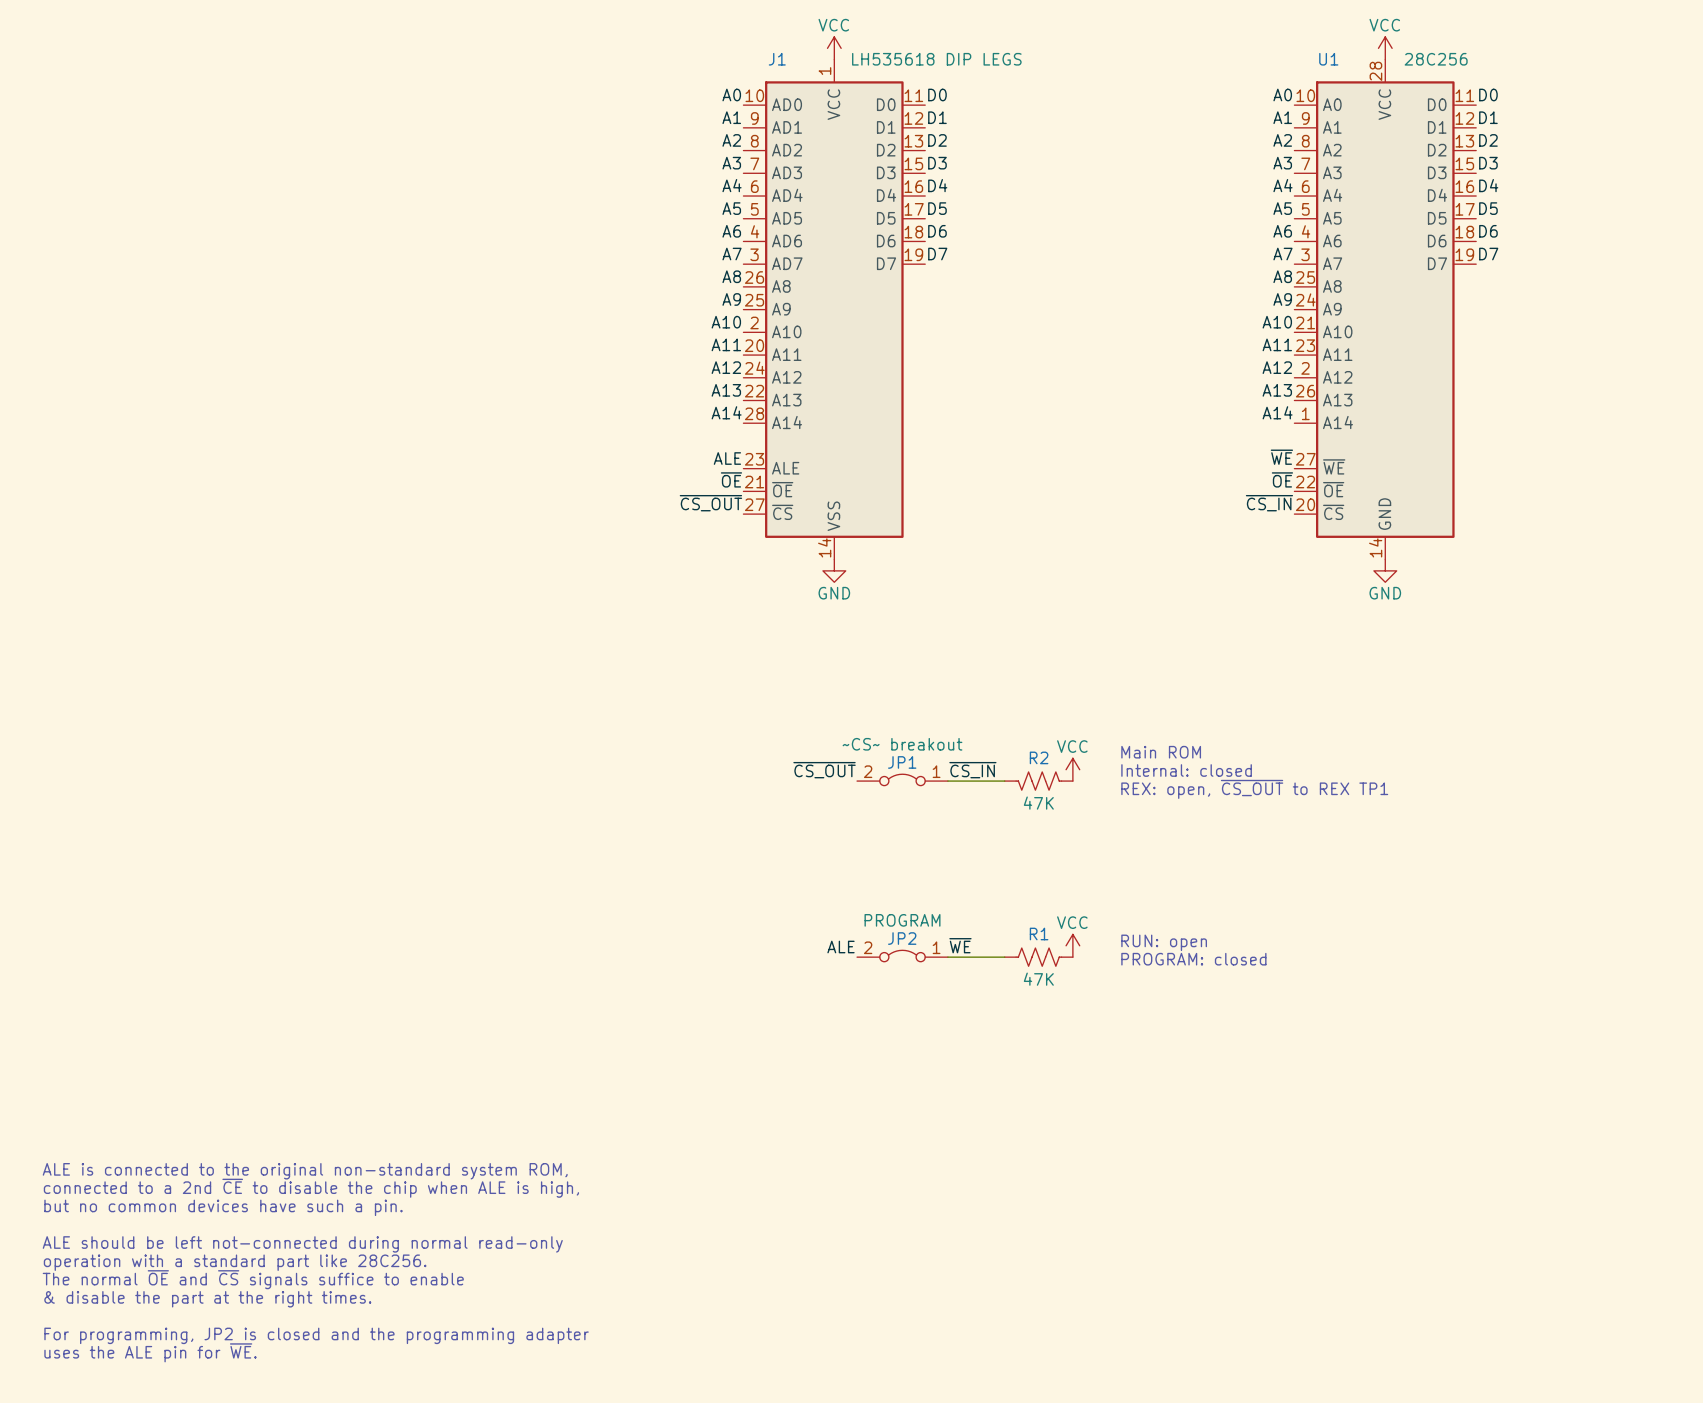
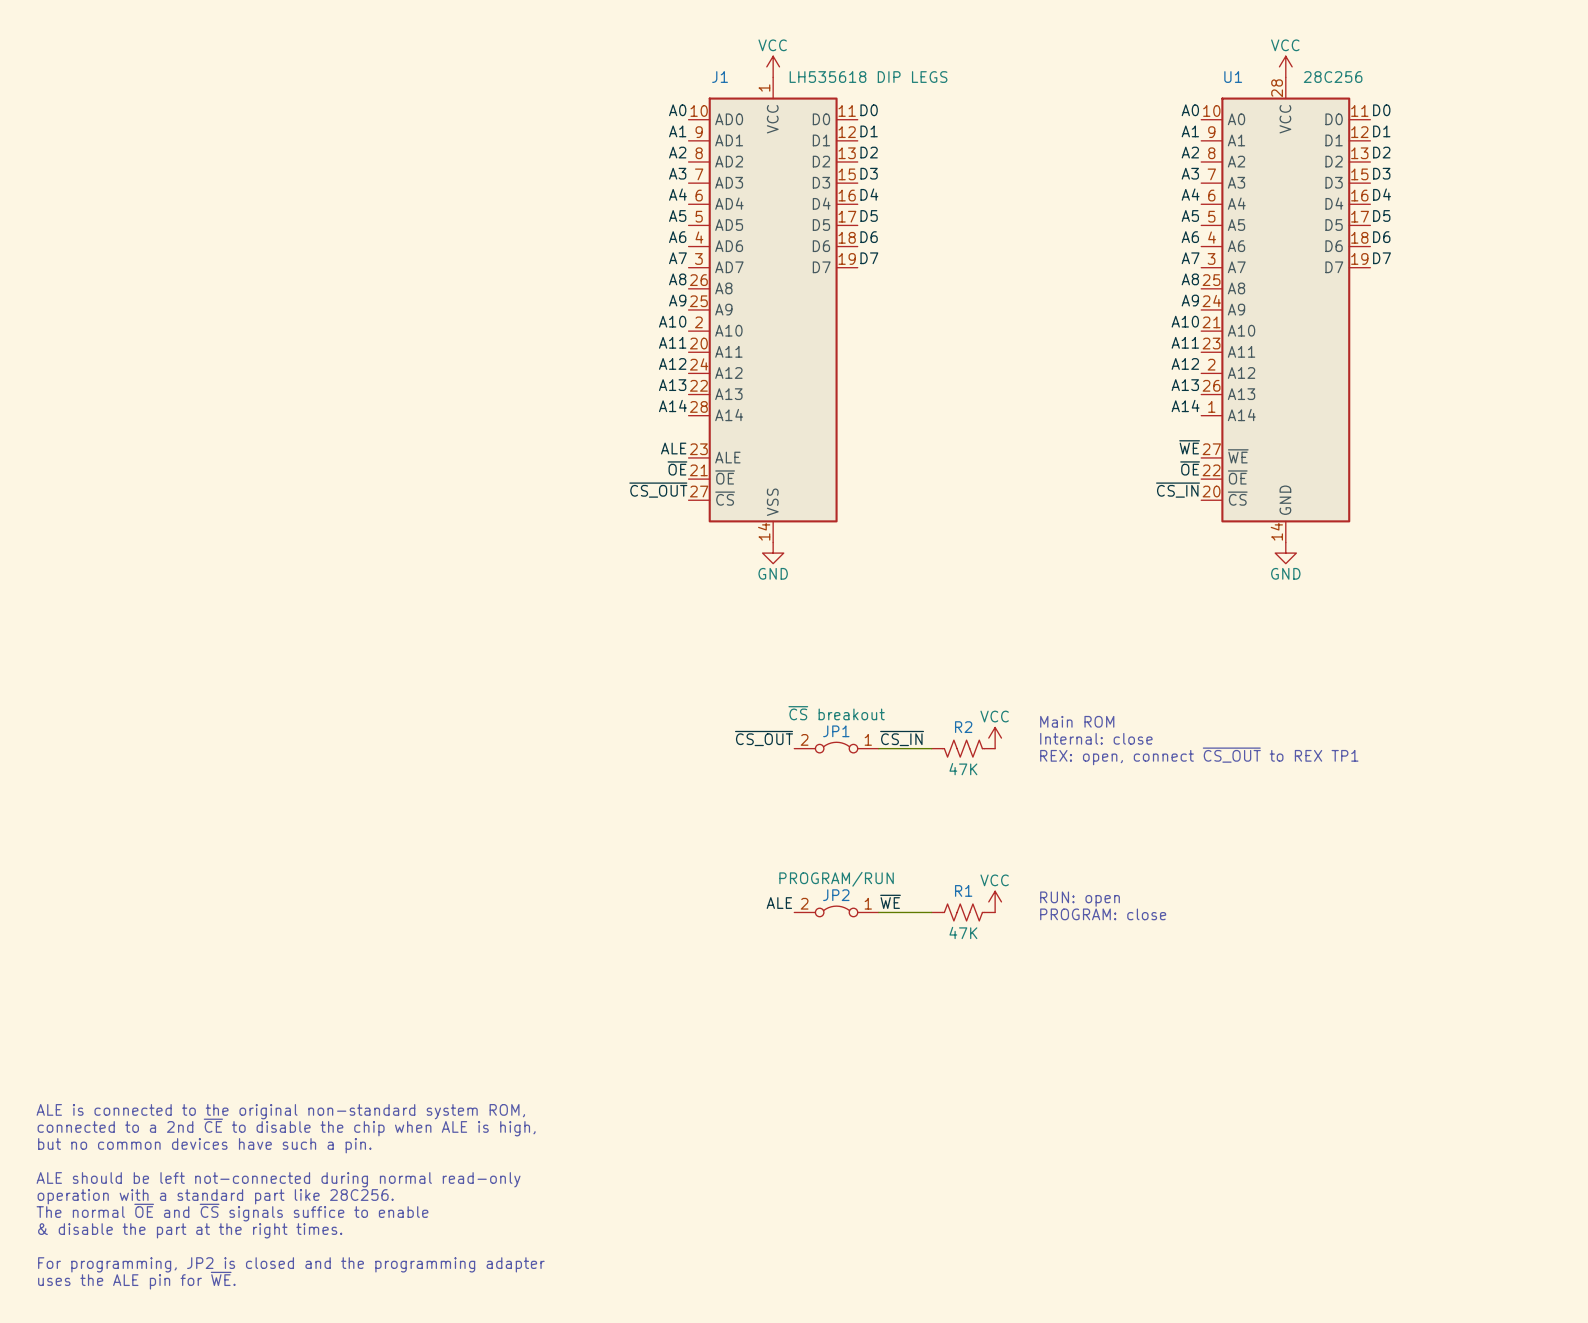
JP1 value: ~CS~ breakout (902, 744) -> ~{CS} breakout (836, 713)
text: Internal: closed (1186, 770) -> Internal: close (1096, 738)
text: REX: open, ~{CS_OUT} to REX TP1 (1254, 789) -> REX: open, connect ~{CS_OUT} to REX TP1 (1199, 756)
JP2 value: PROGRAM (902, 920) -> PROGRAM/RUN (836, 879)
text: PROGRAM: closed (1193, 959) -> PROGRAM: close (1103, 914)

